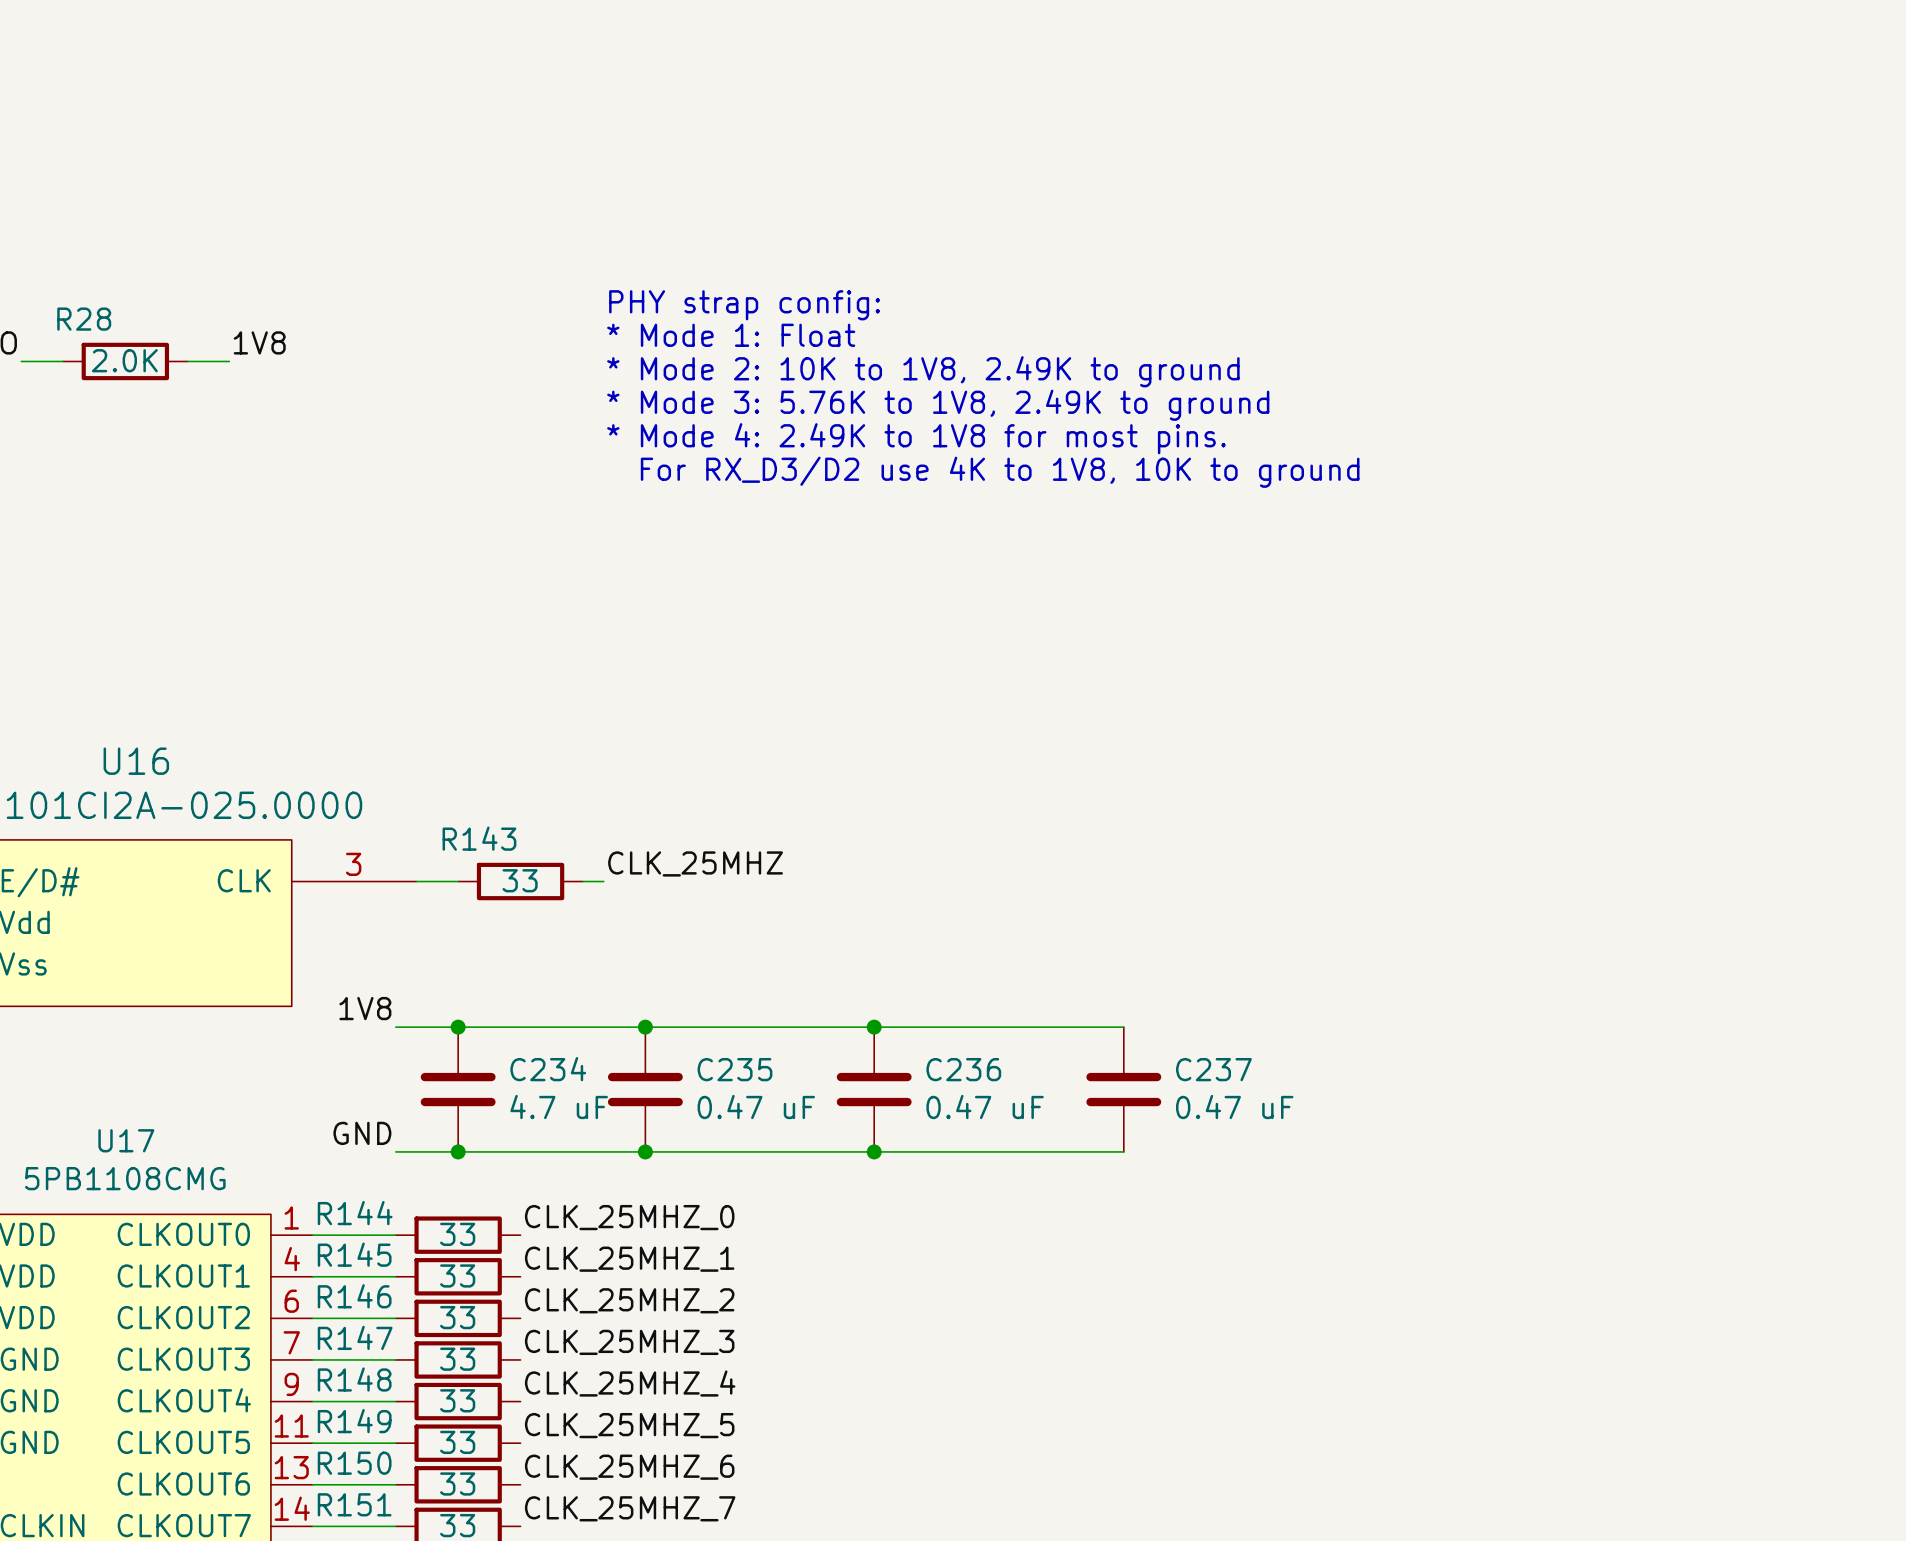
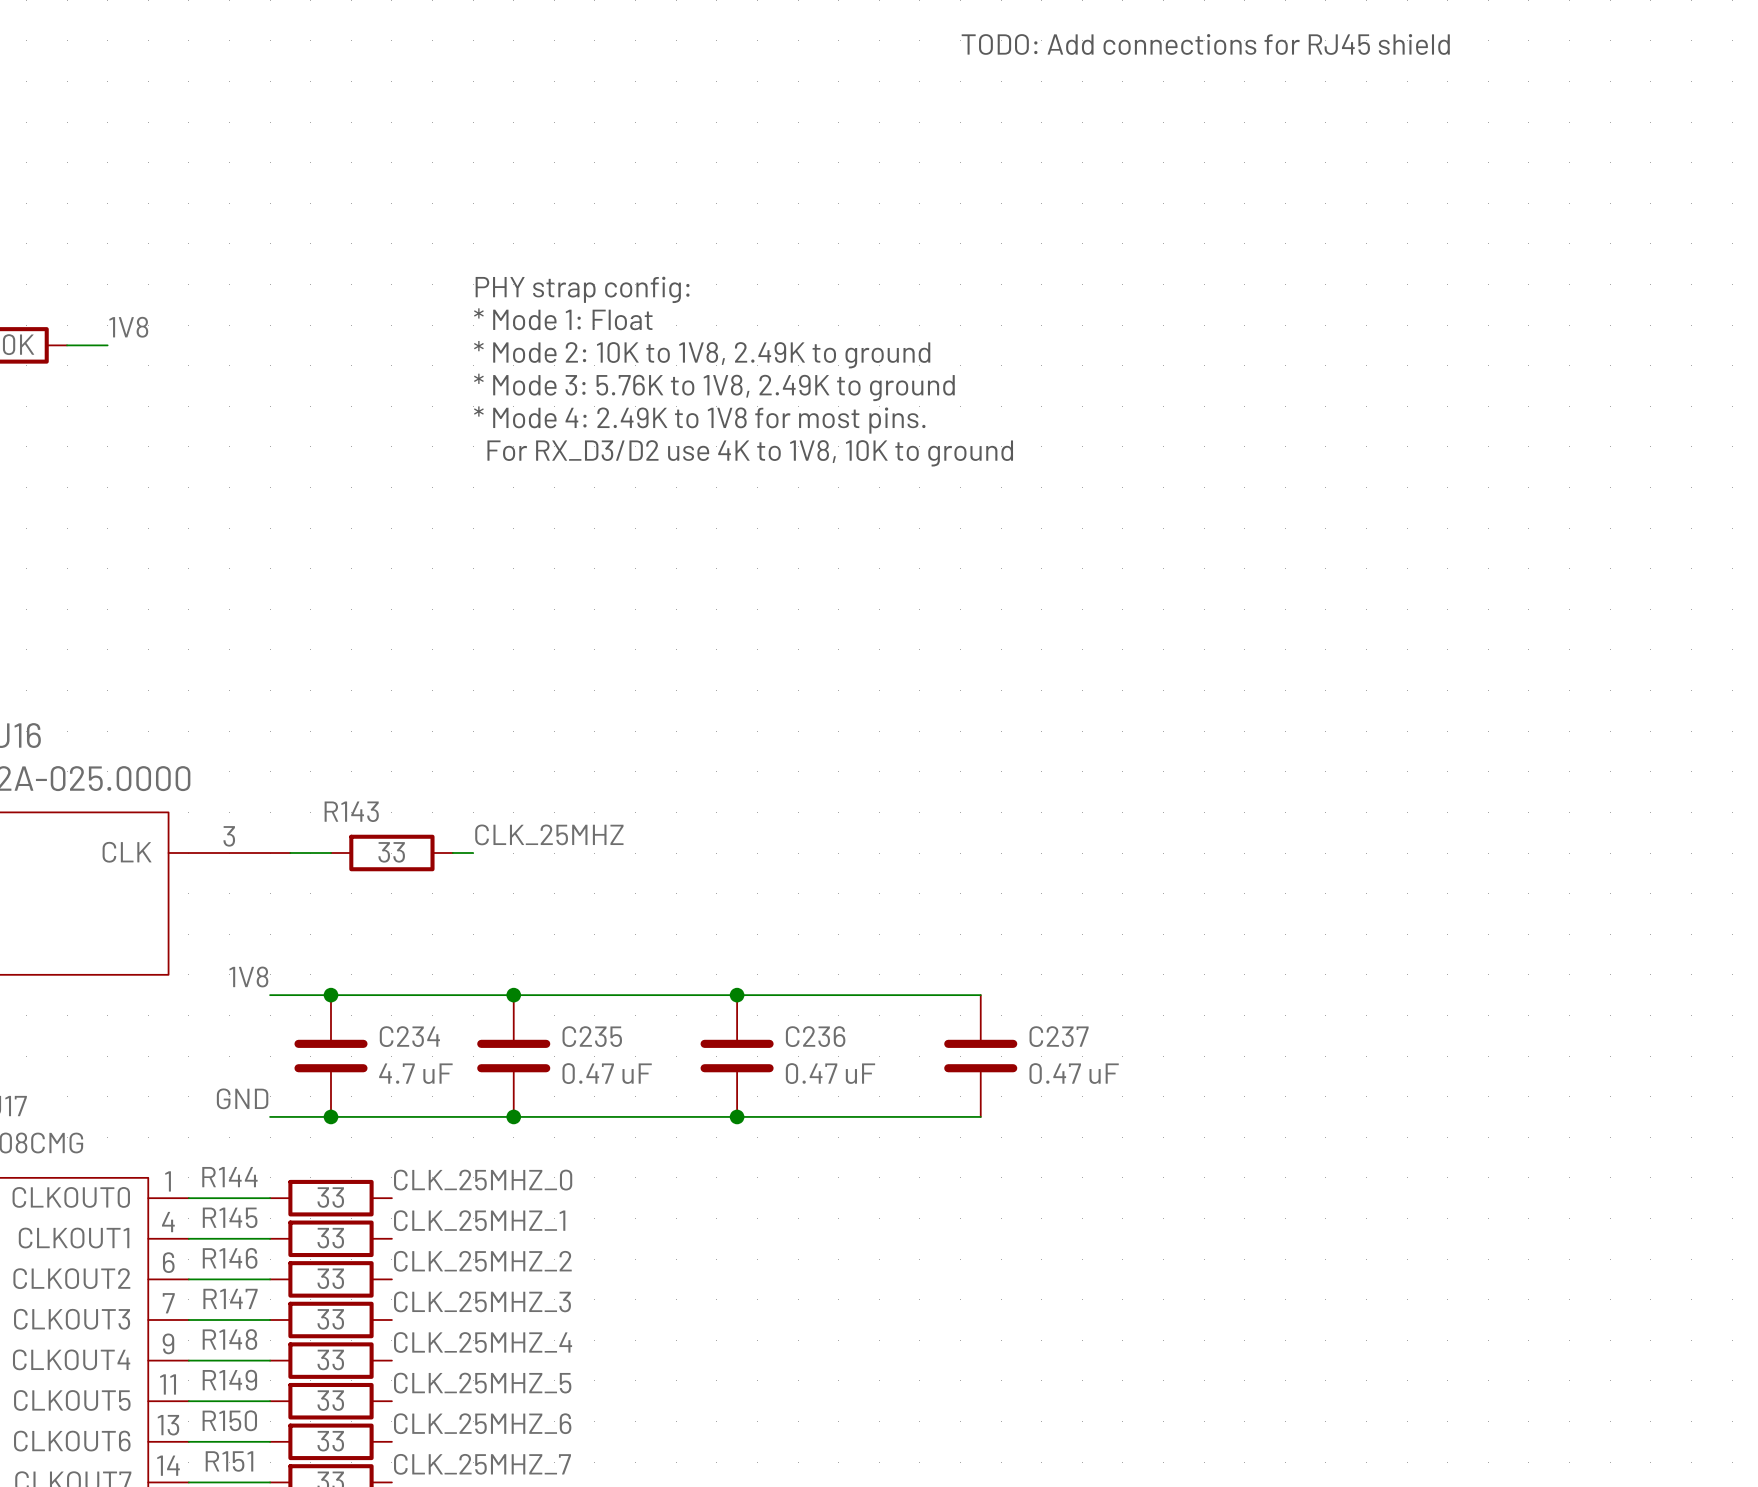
text: none -> TODO: Add connections for RJ45 shield (1205, 44)

